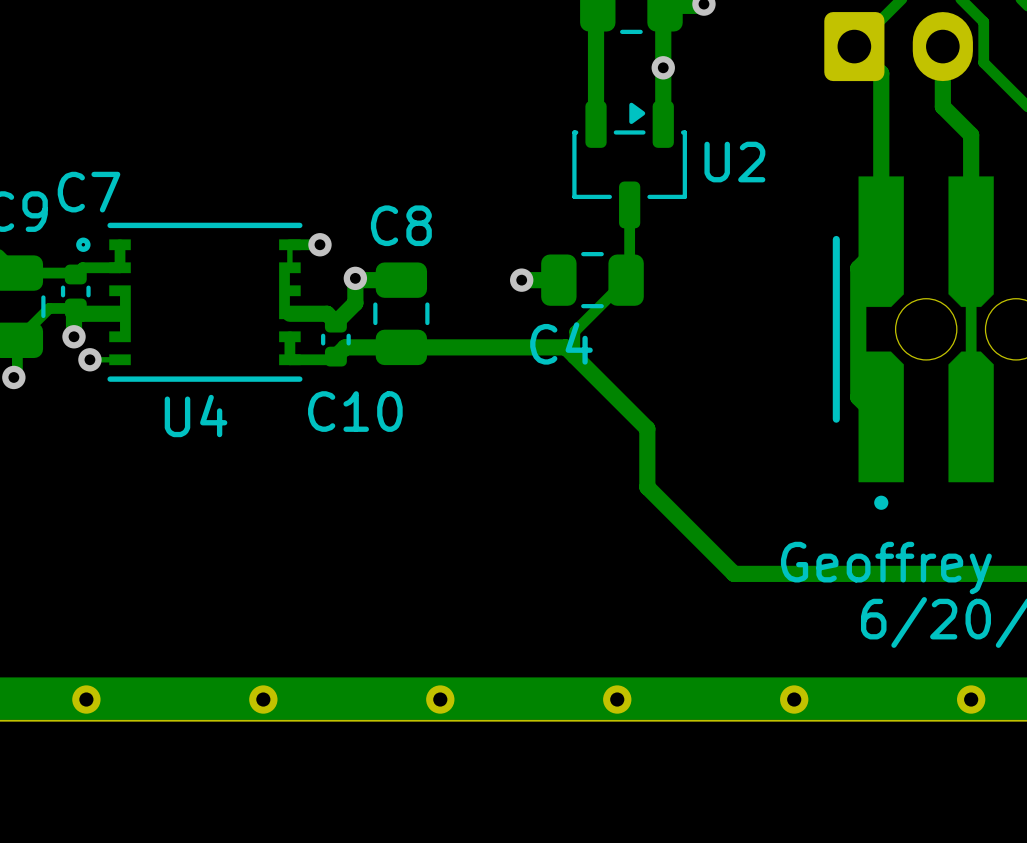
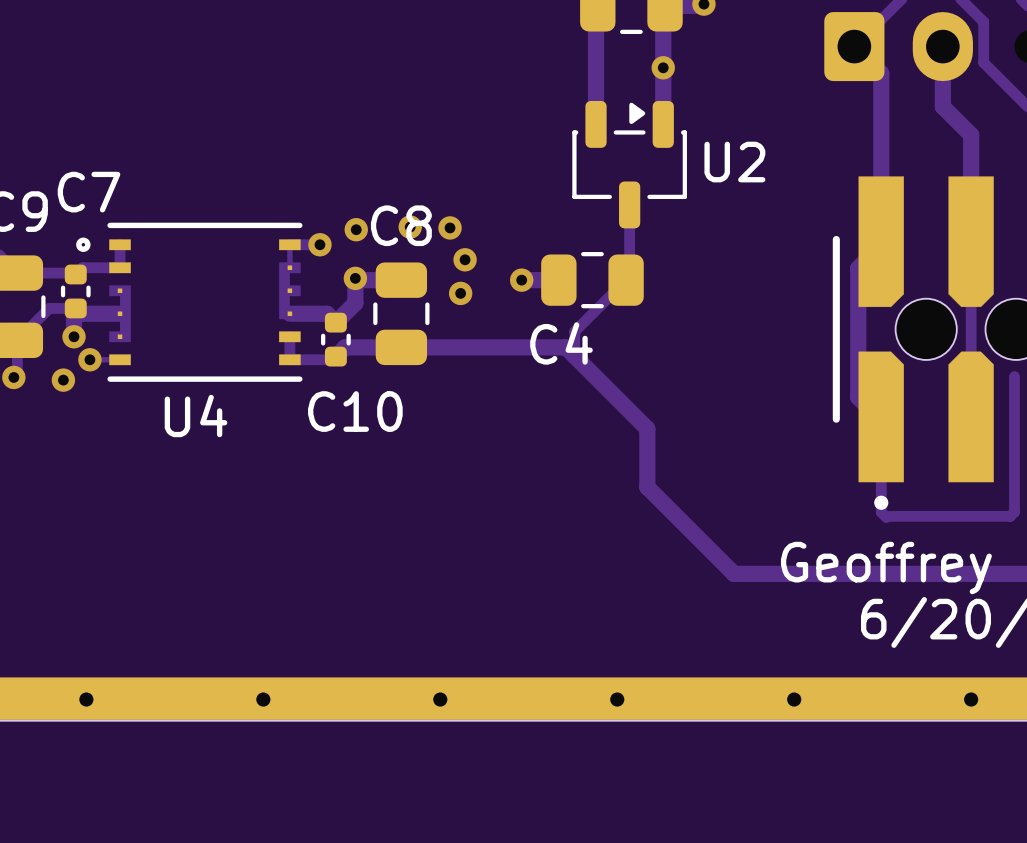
via: none -> (410, 227)
via: none -> (450, 227)
via: none -> (356, 229)
via: none -> (465, 259)
via: none -> (460, 293)
track: none -> (1014, 376) (1014, 511) (1010, 516) (886, 517) (881, 512) (881, 416)
via: none -> (63, 380)

